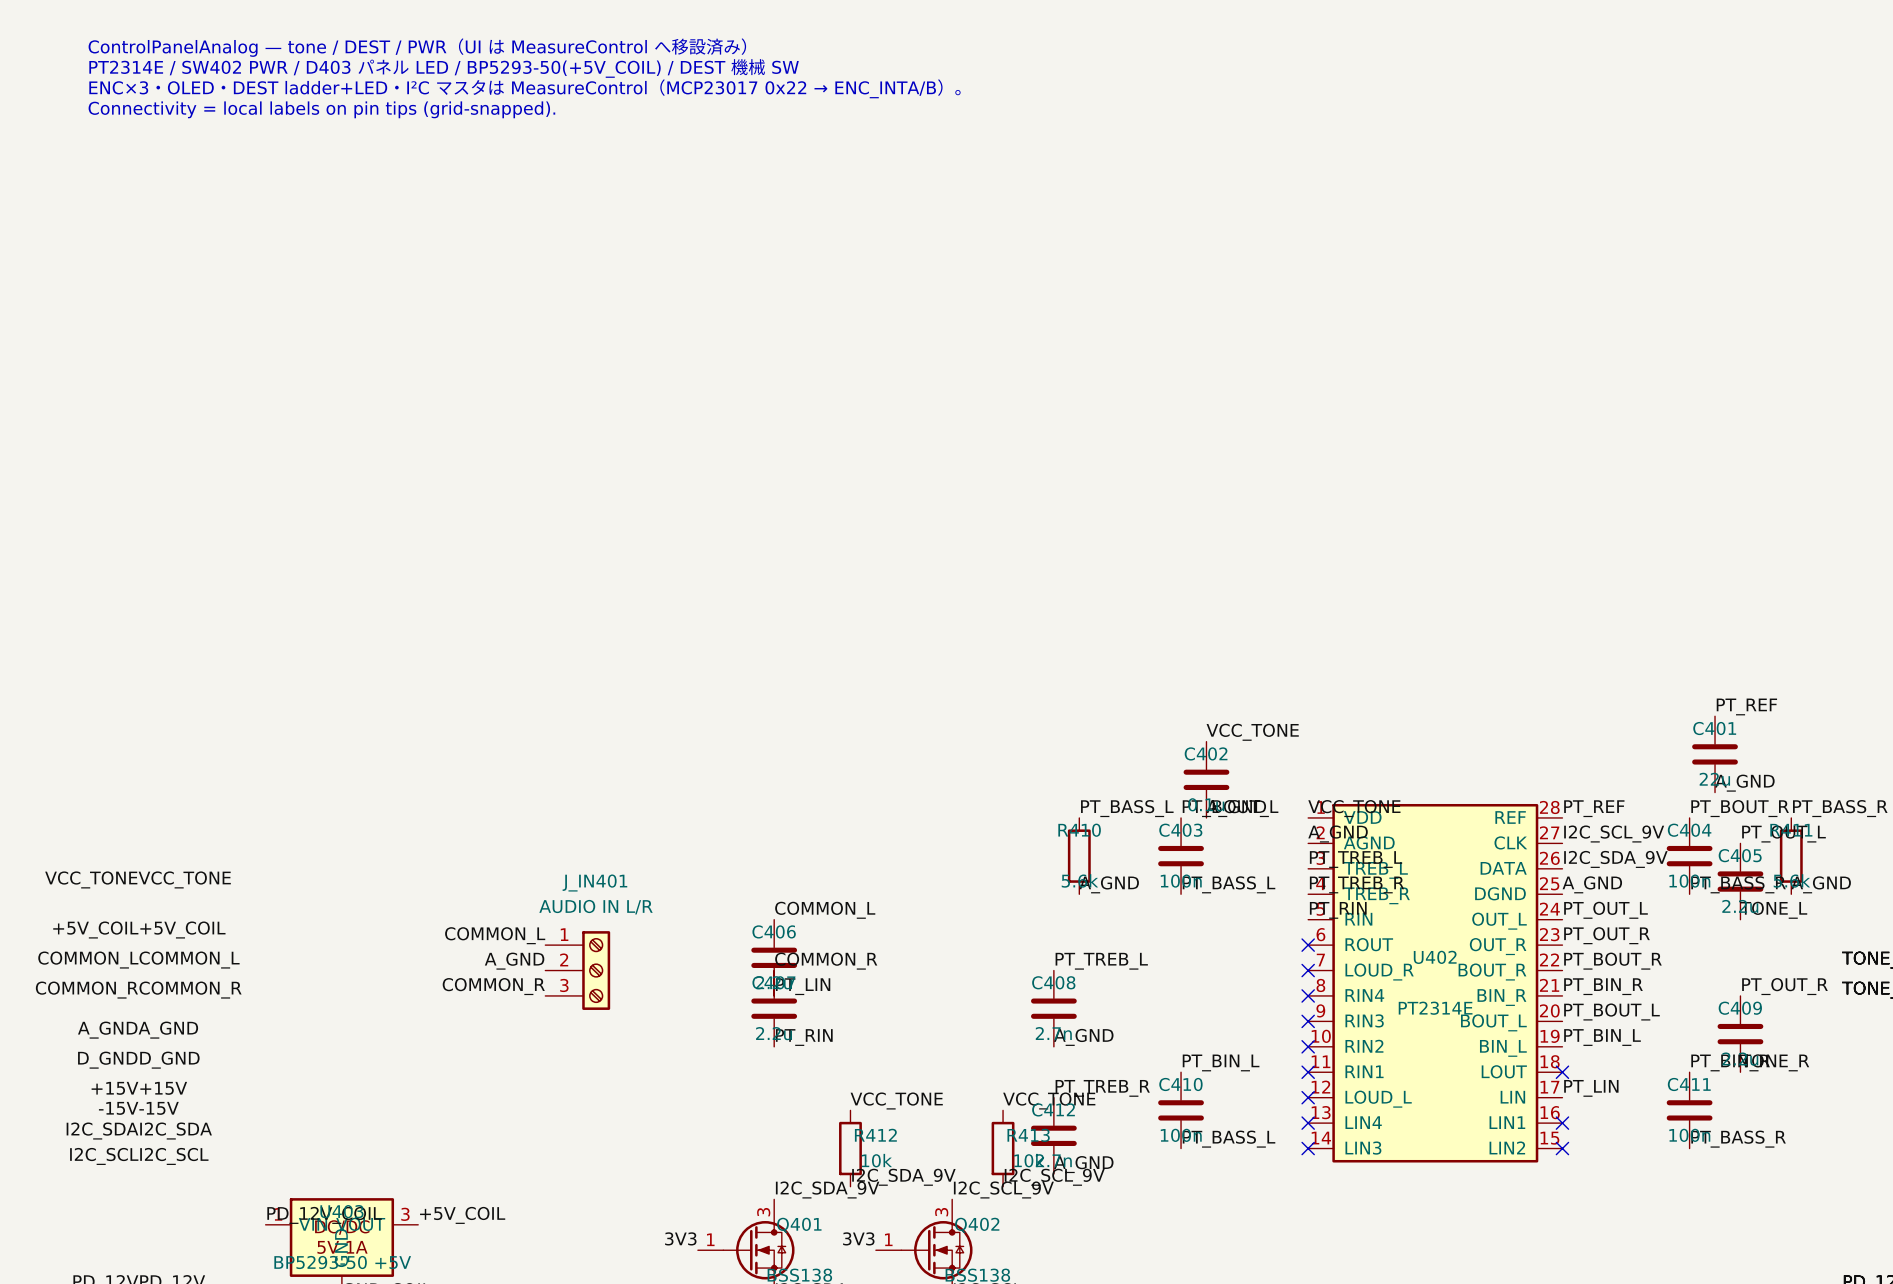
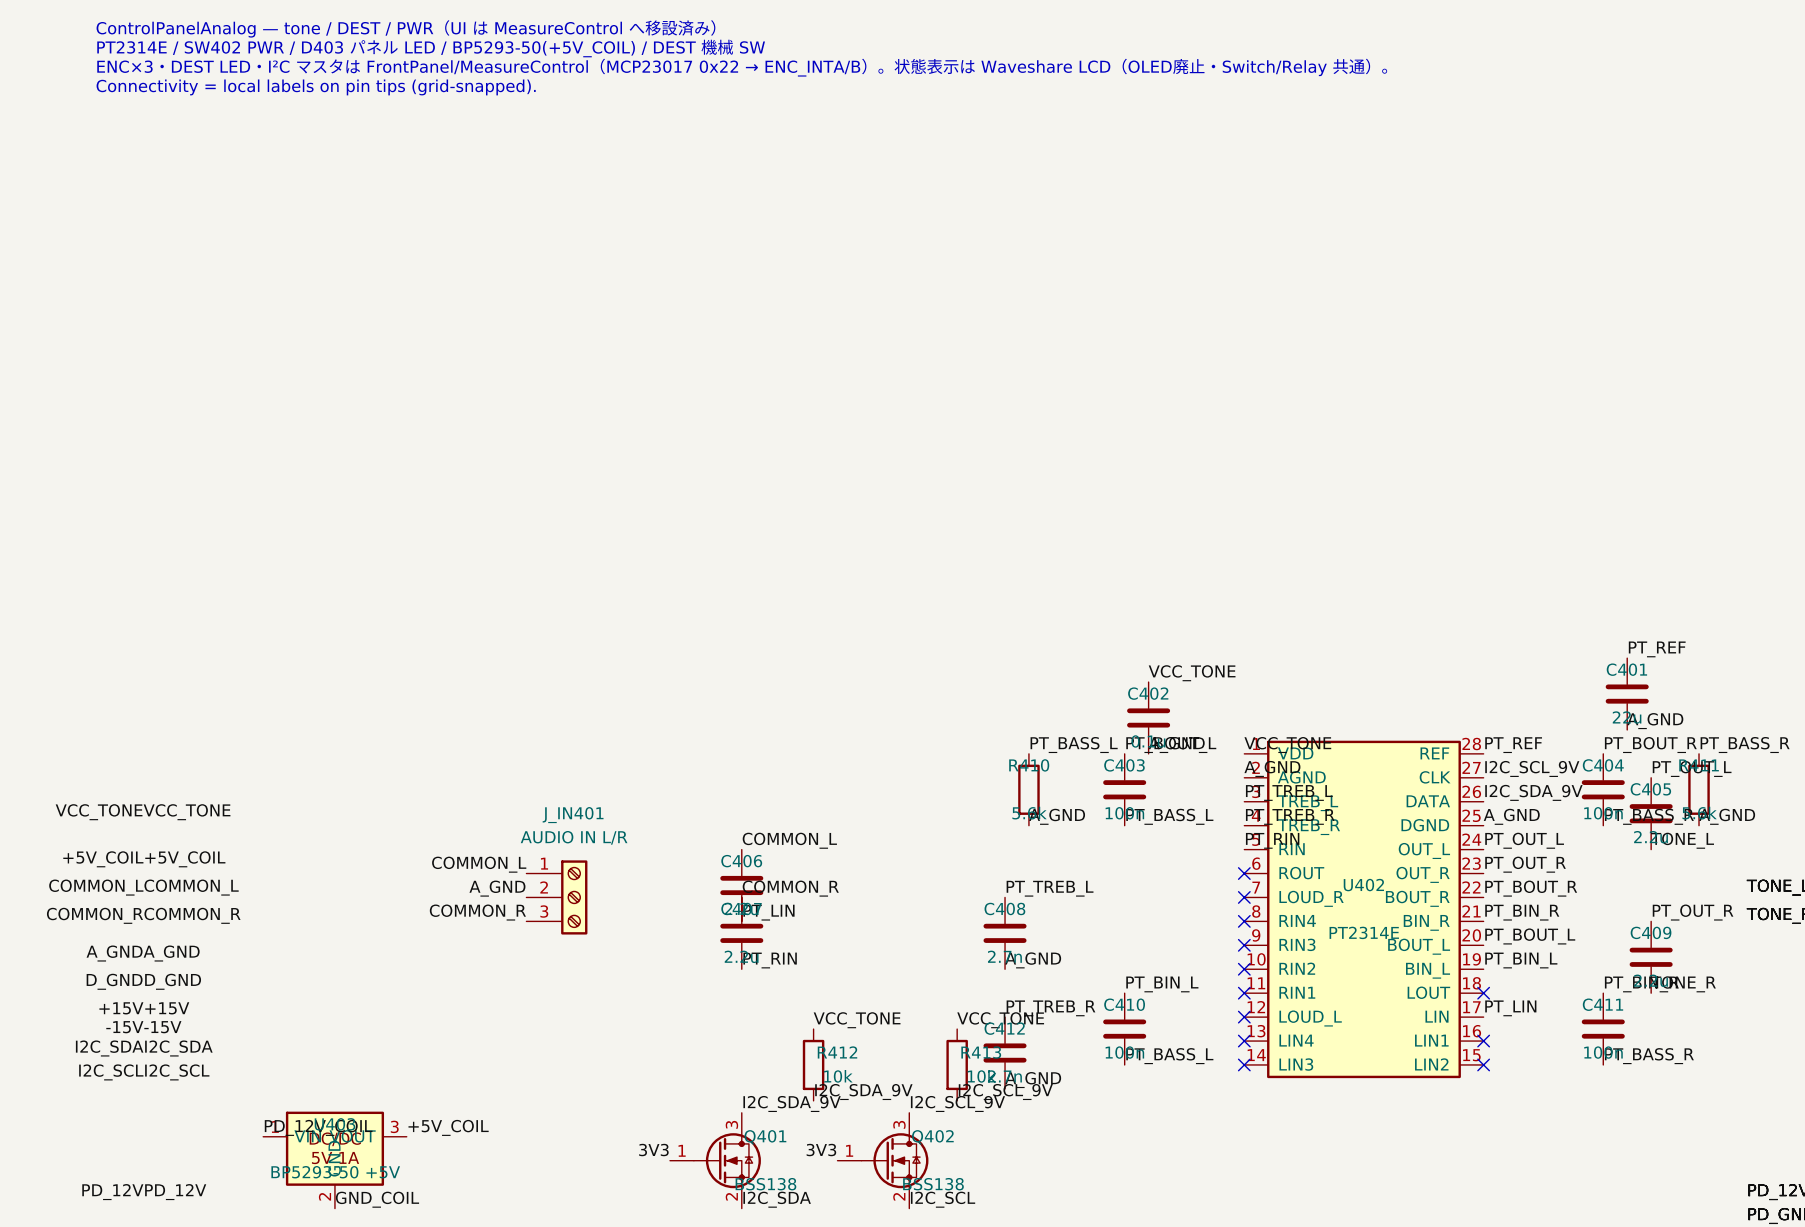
text: ENC×3・OLED・DEST ladder+LED・I²C マスタは MeasureControl（MCP23017 0x22 → ENC_INTA/B）。 (524, 88) -> ENC×3・DEST LED・I²C マスタは FrontPanel/MeasureControl（MCP23017 0x22 → ENC_INTA/B）。状態表示は Waveshare LCD（OLED廃止・Switch/Relay 共通）。 (742, 67)

